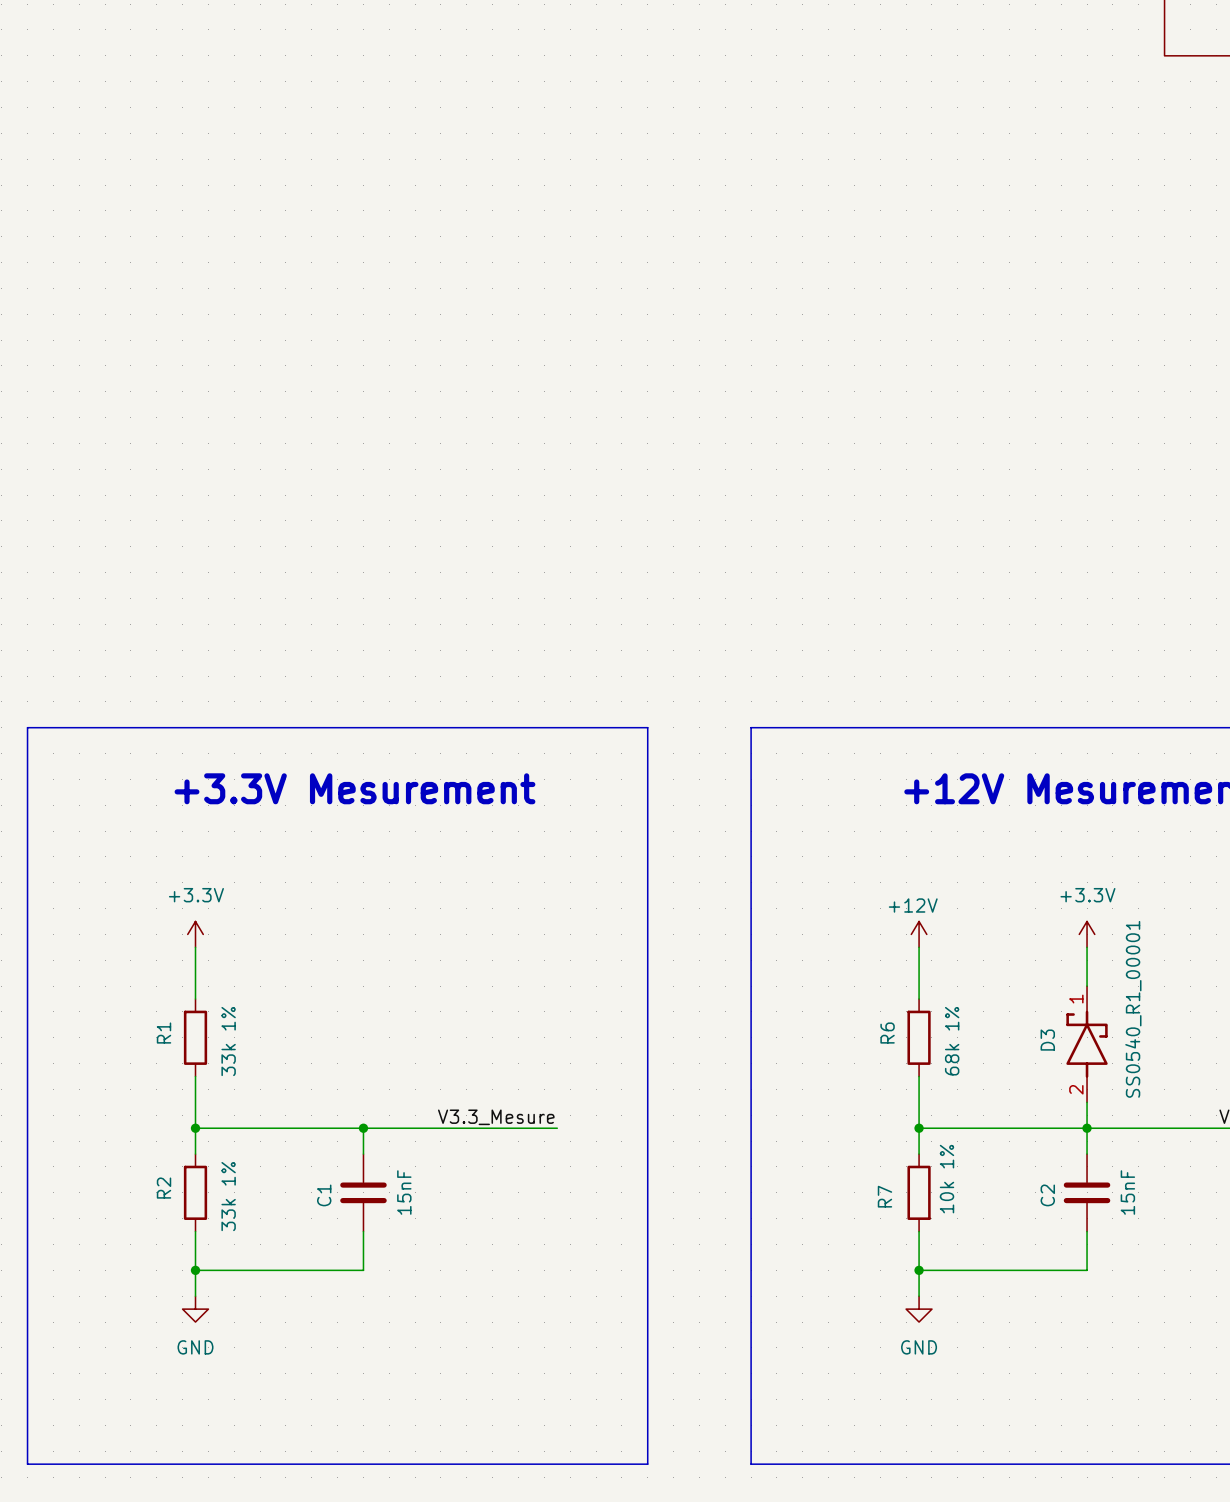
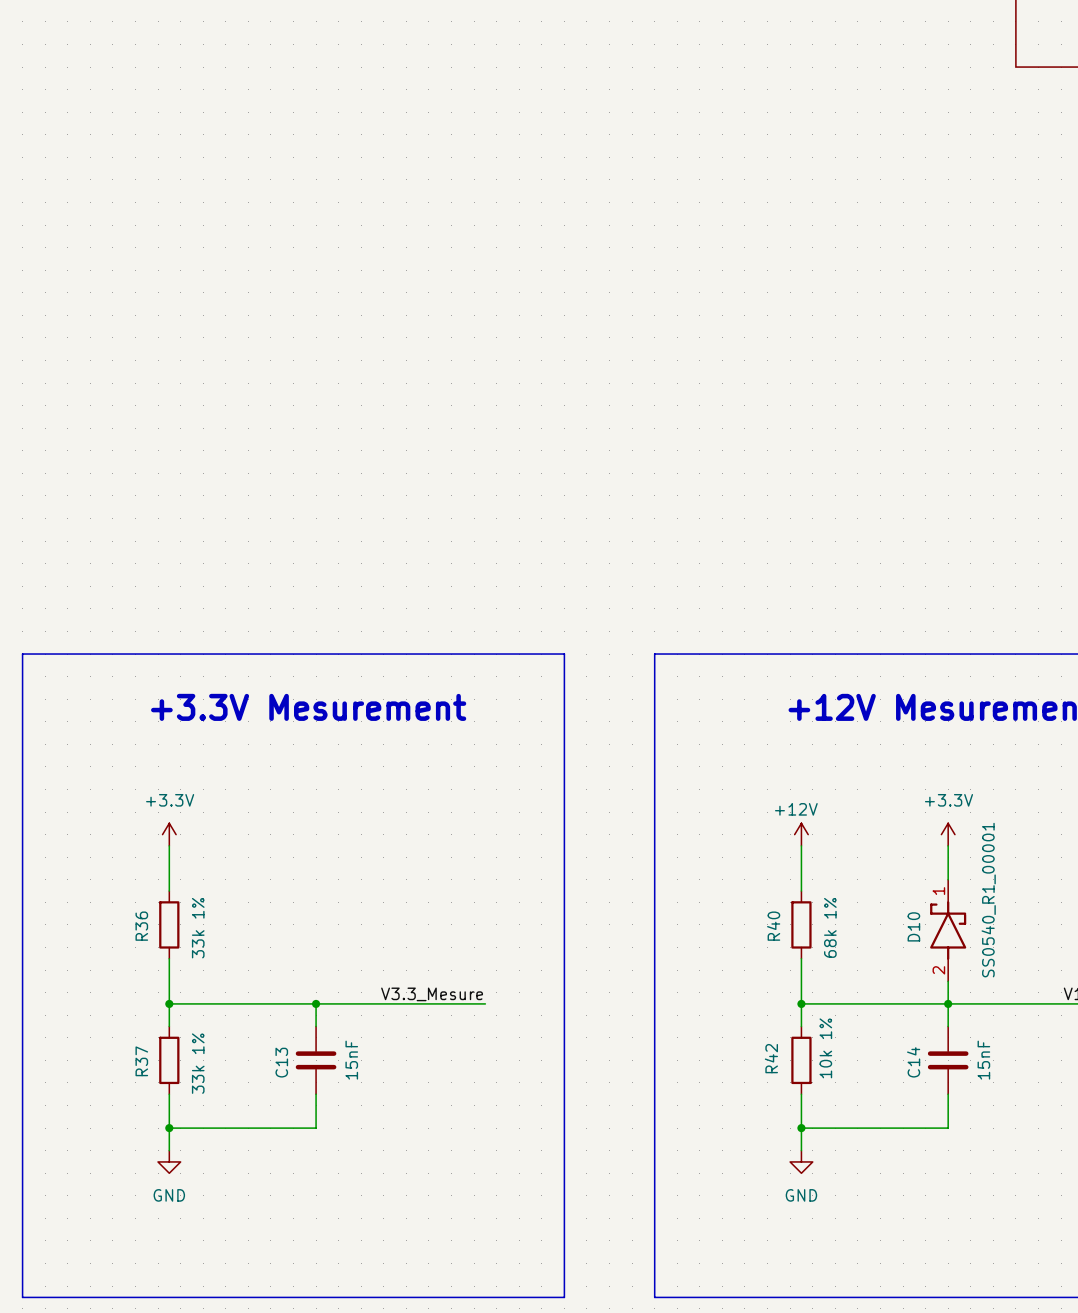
R1 name: R1 (164, 1033) -> R36 (141, 926)
R6 name: R6 (887, 1033) -> R40 (773, 926)
D3 name: D3 (1047, 1040) -> D10 (913, 926)
R2 name: R2 (164, 1188) -> R37 (141, 1061)
C1 name: C1 (324, 1195) -> C13 (281, 1062)
C2 name: C2 (1047, 1195) -> C14 (913, 1062)
R7 name: R7 (884, 1196) -> R42 (771, 1058)

